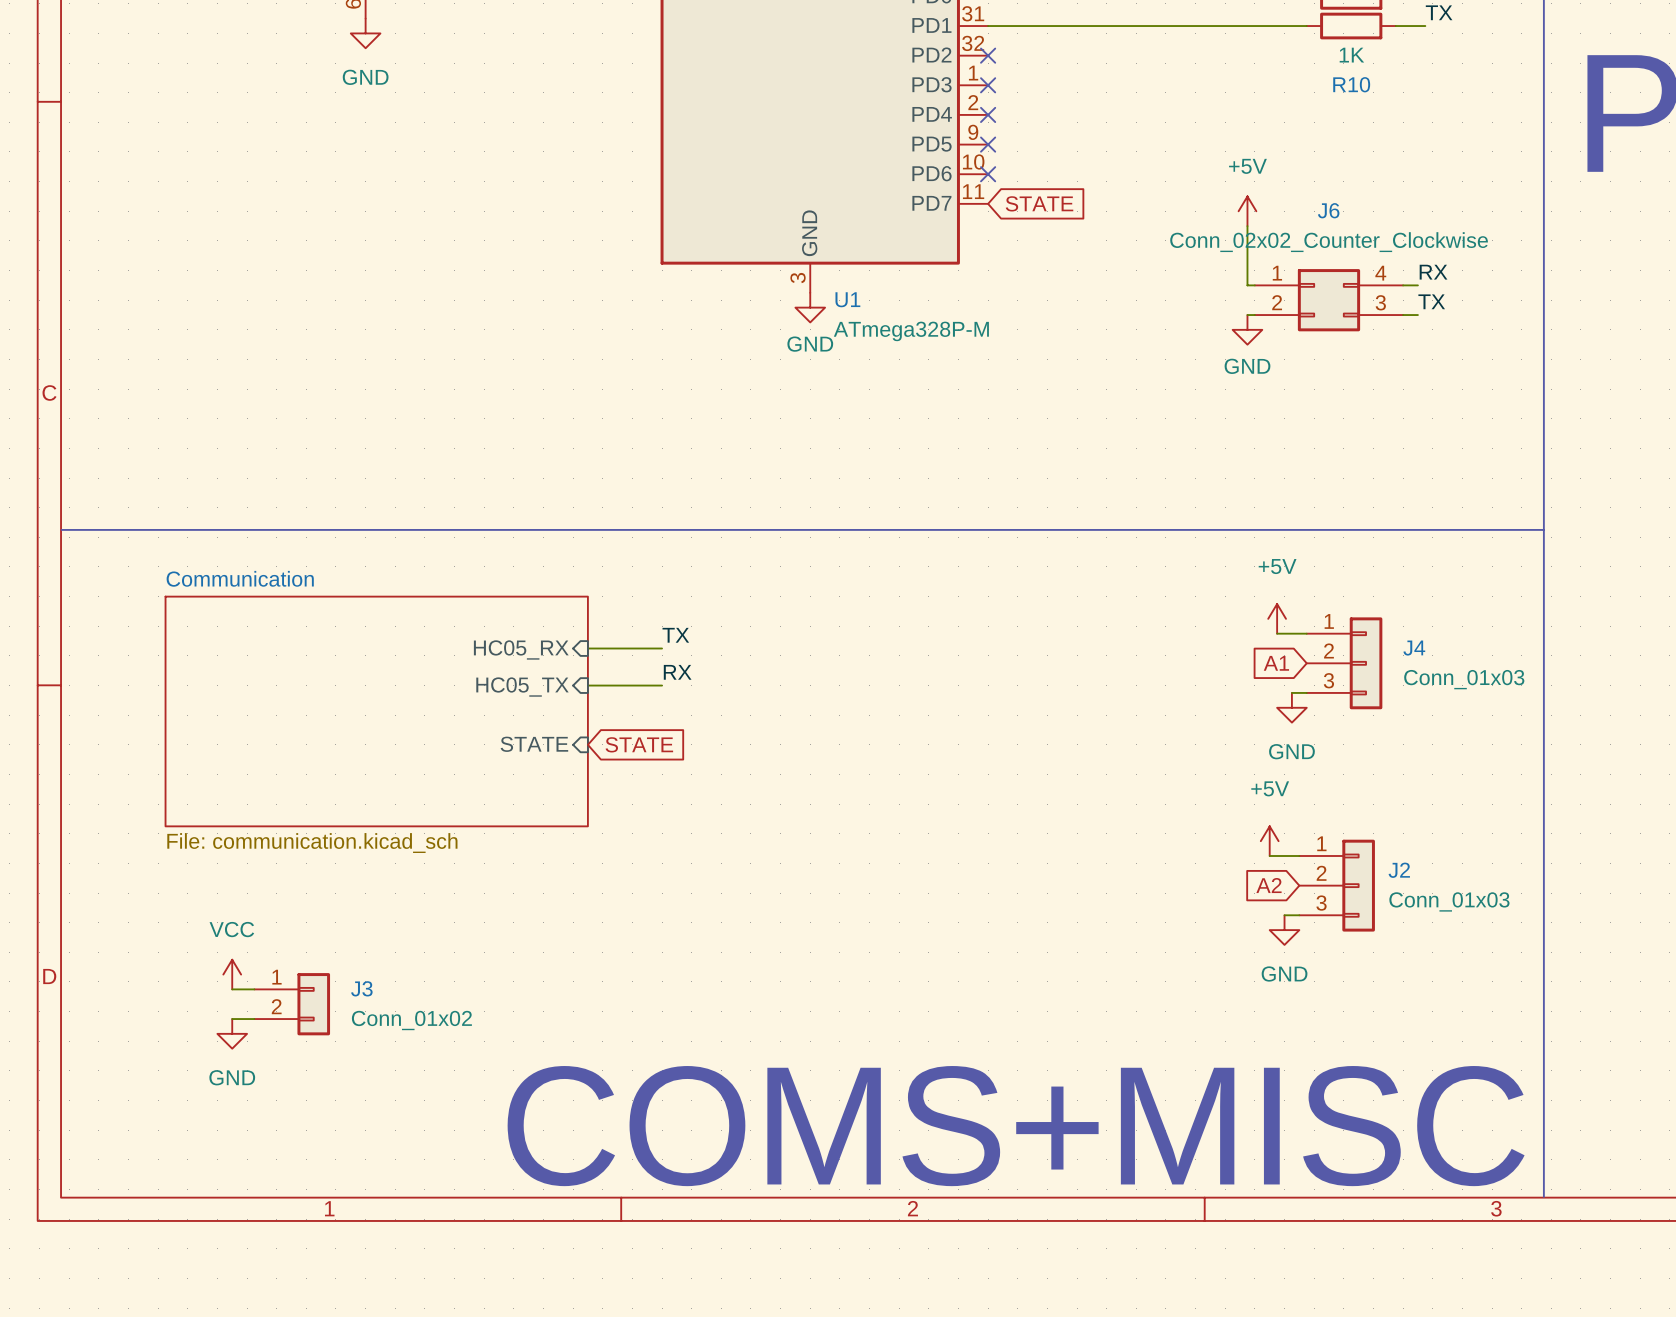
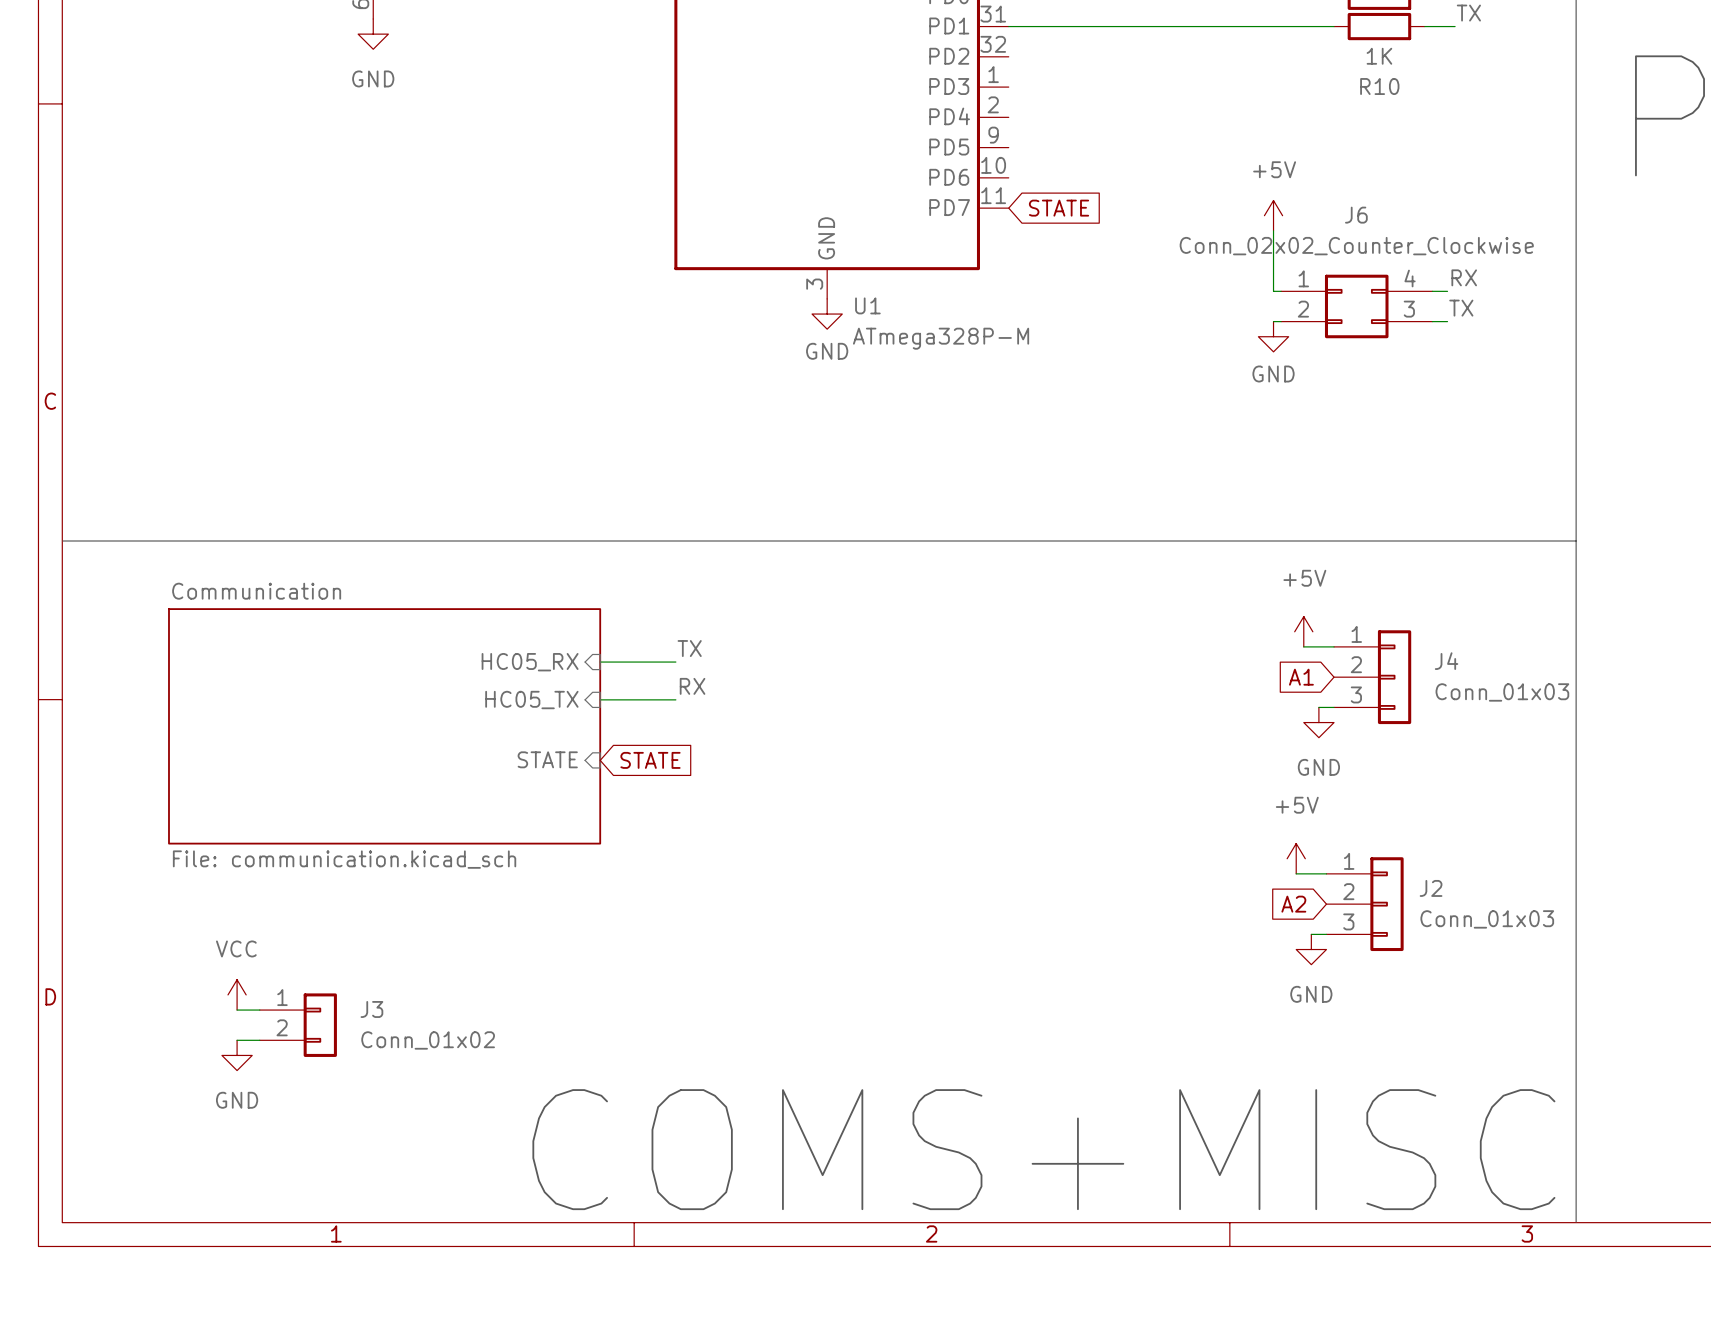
no-connect mark: (988, 55) -> none
no-connect mark: (988, 85) -> none
no-connect mark: (988, 114) -> none
no-connect mark: (988, 144) -> none
no-connect mark: (988, 174) -> none

